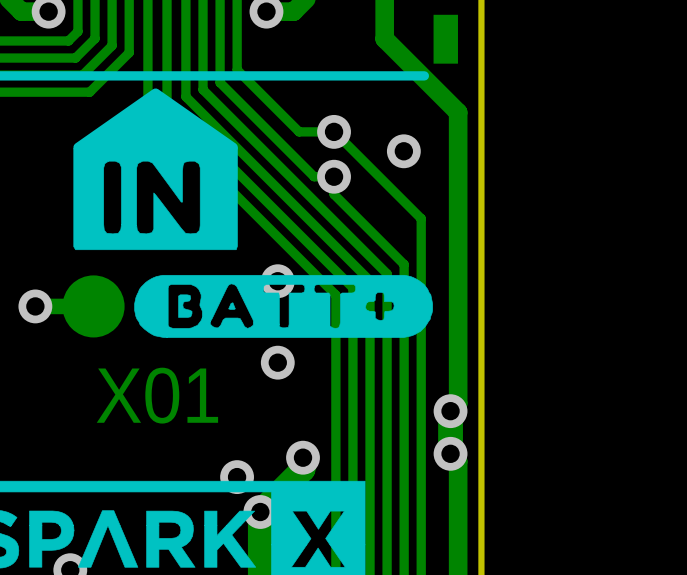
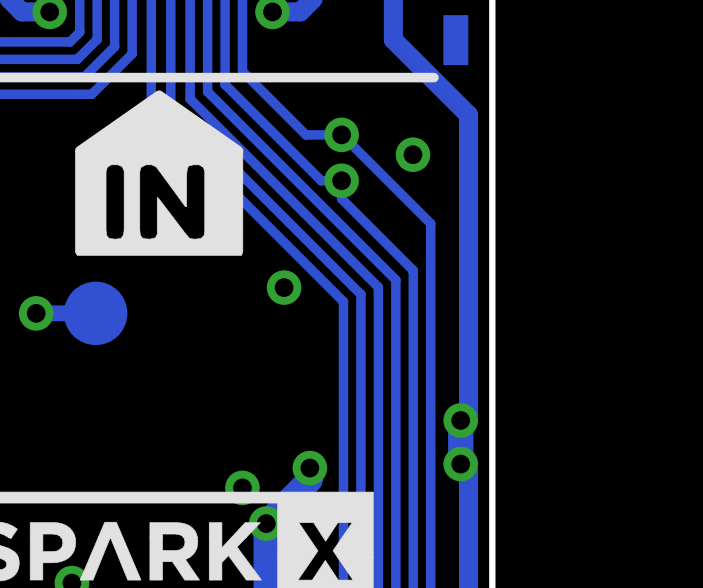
drawing: [134, 274, 433, 338] -> none
via: (277, 362) -> none
text: X01 (157, 395) -> none

